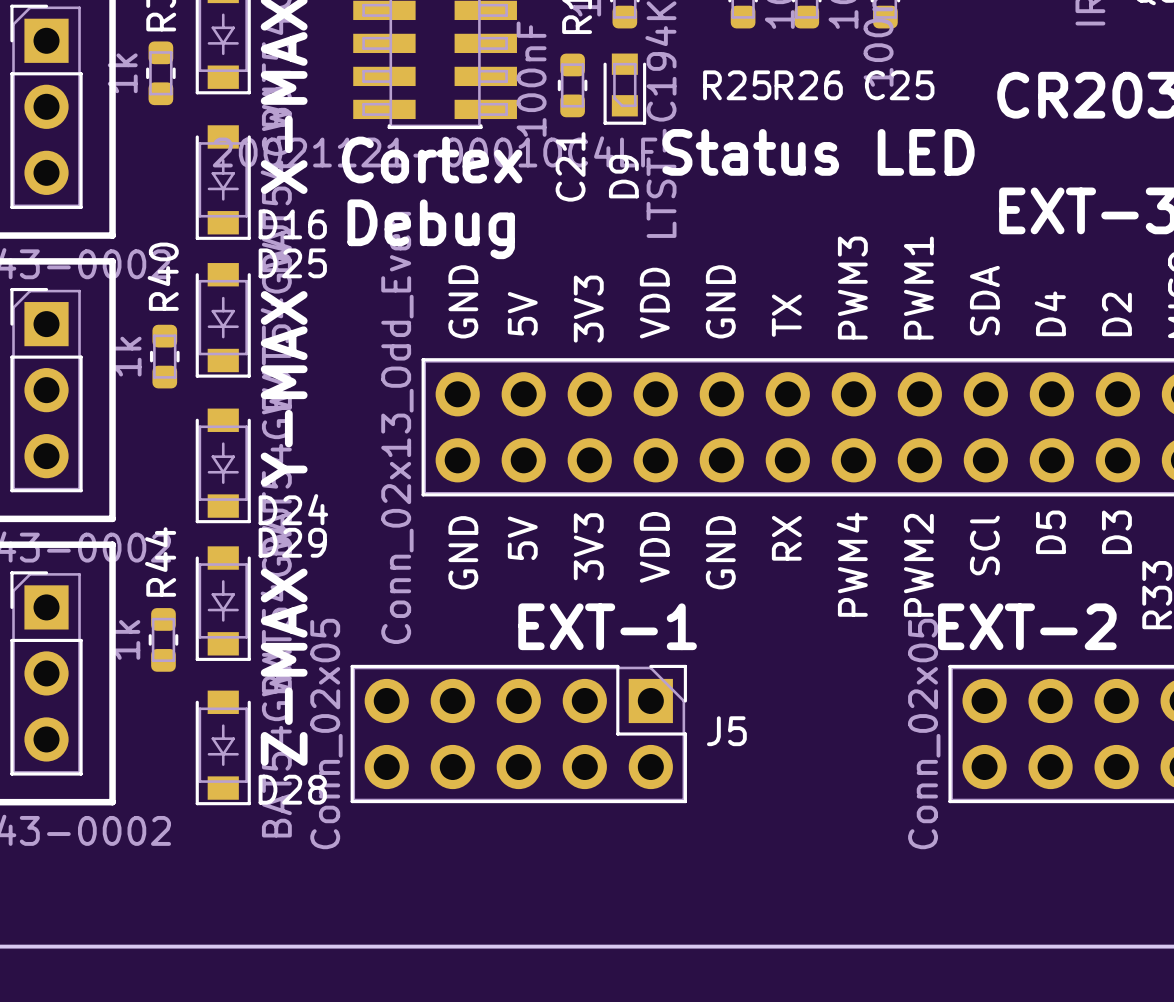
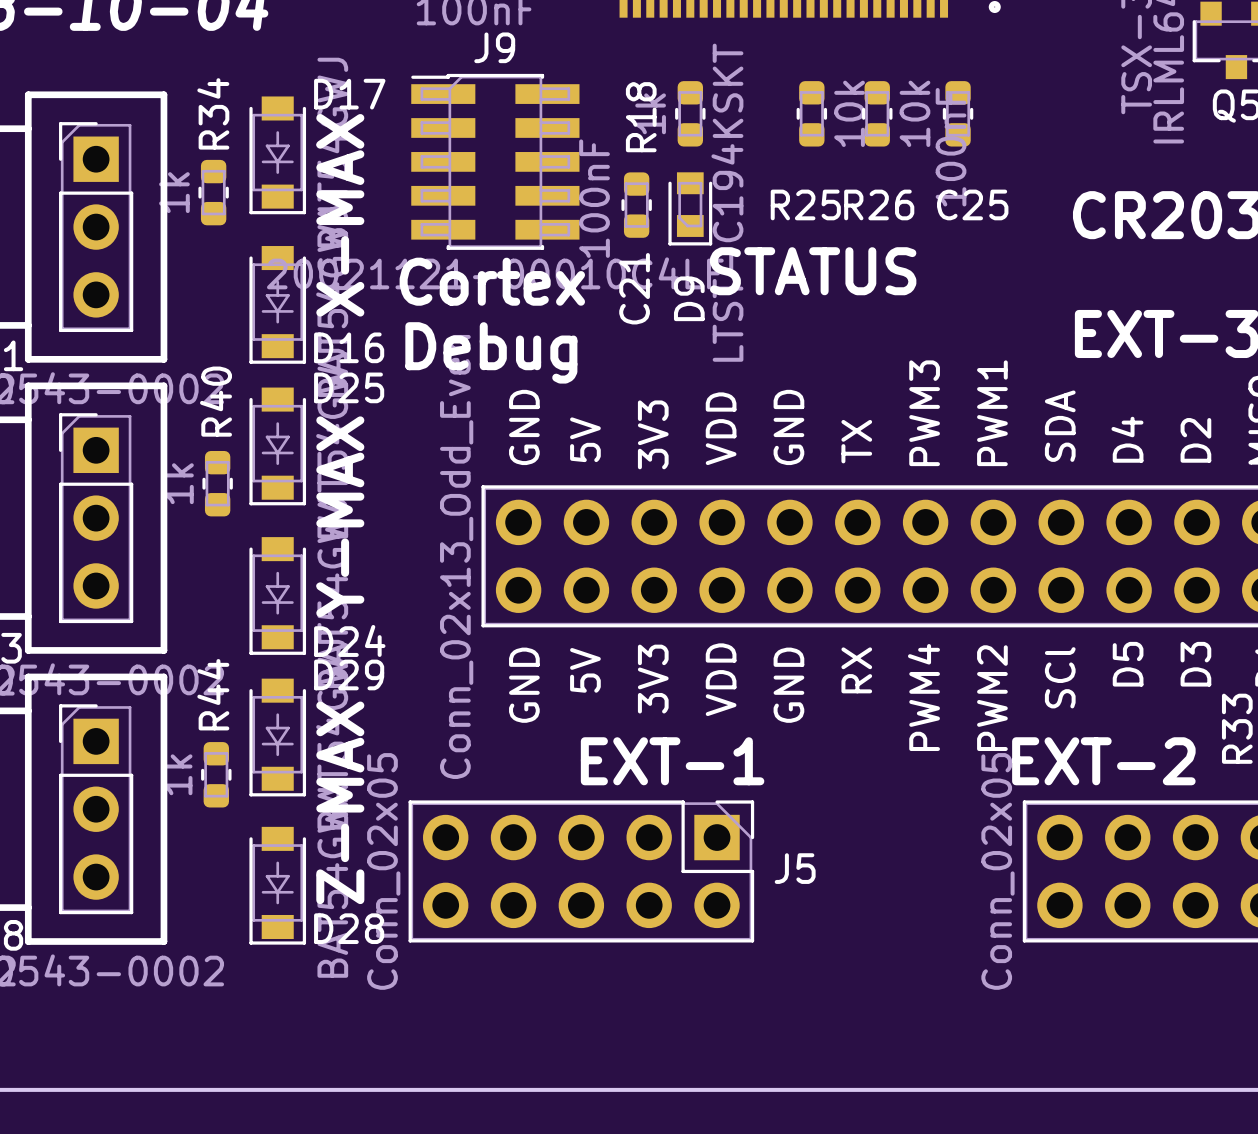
text: none -> STATUS (813, 271)
text: Status LED (818, 152) -> none

